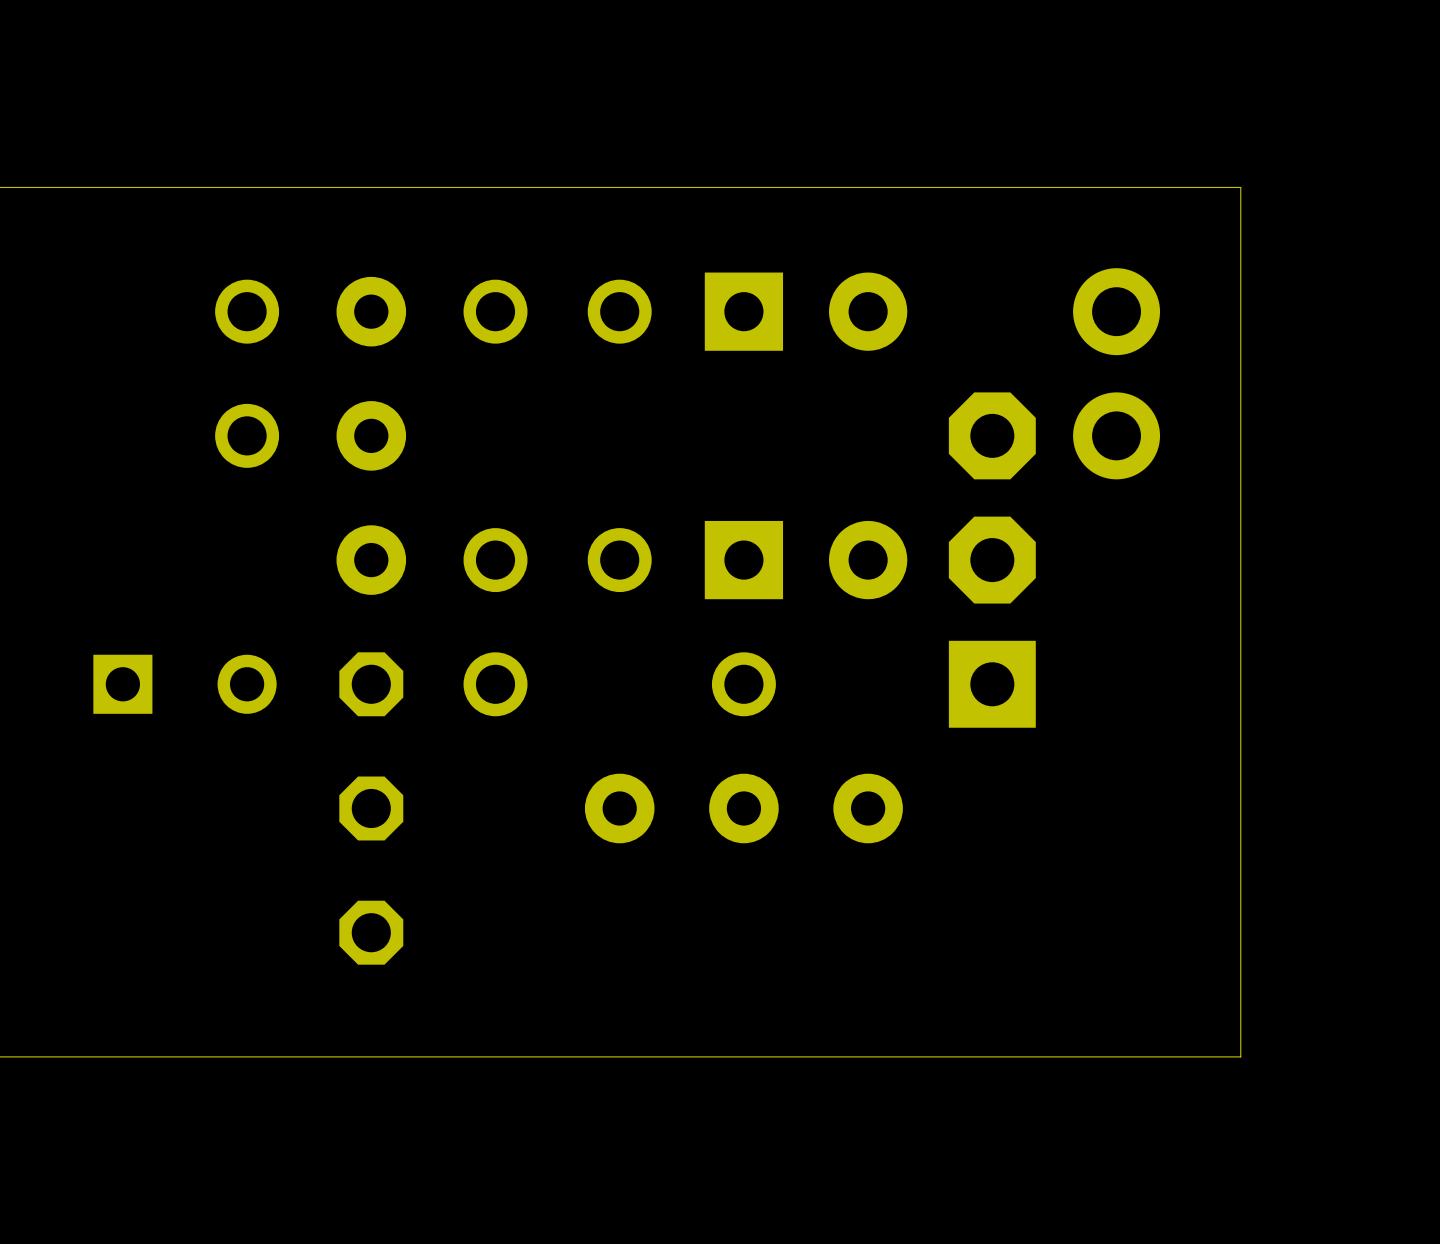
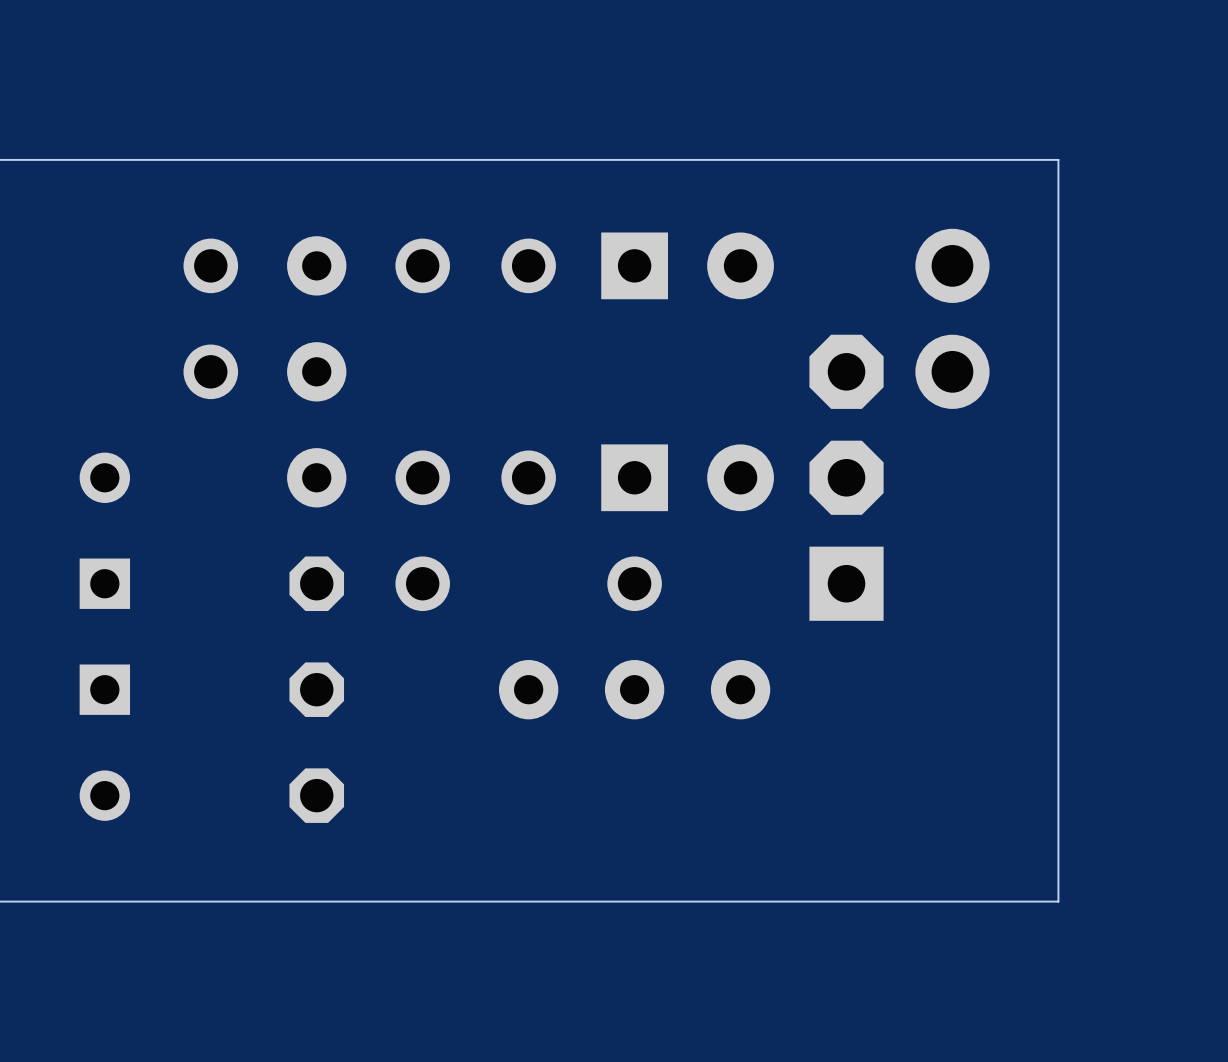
part rotation: 0° (184, 684) -> 90° counterclockwise (104, 530)
part: none -> (104, 742)

